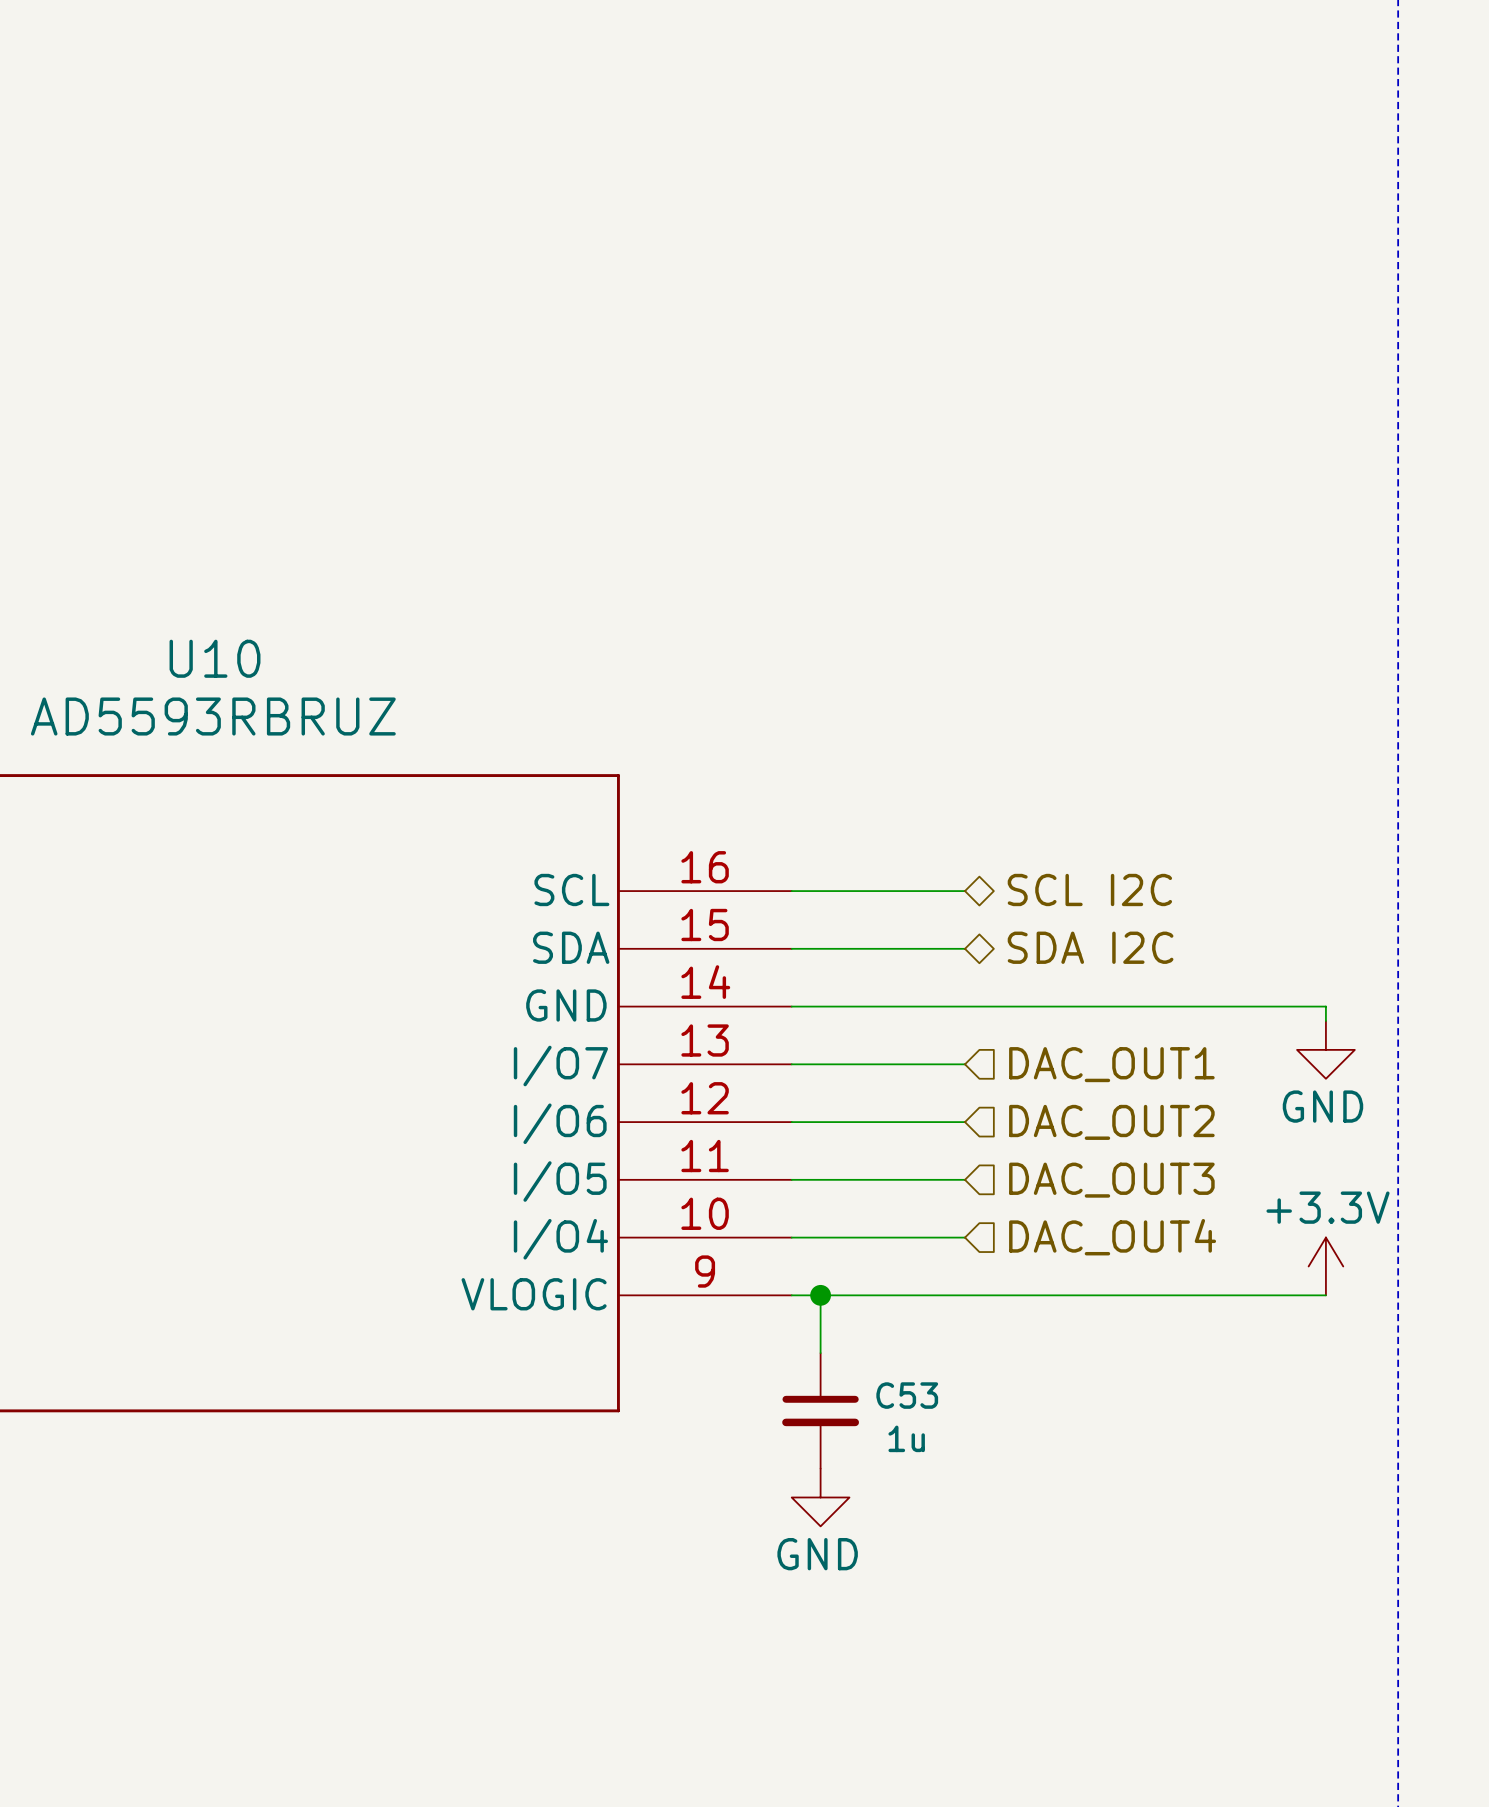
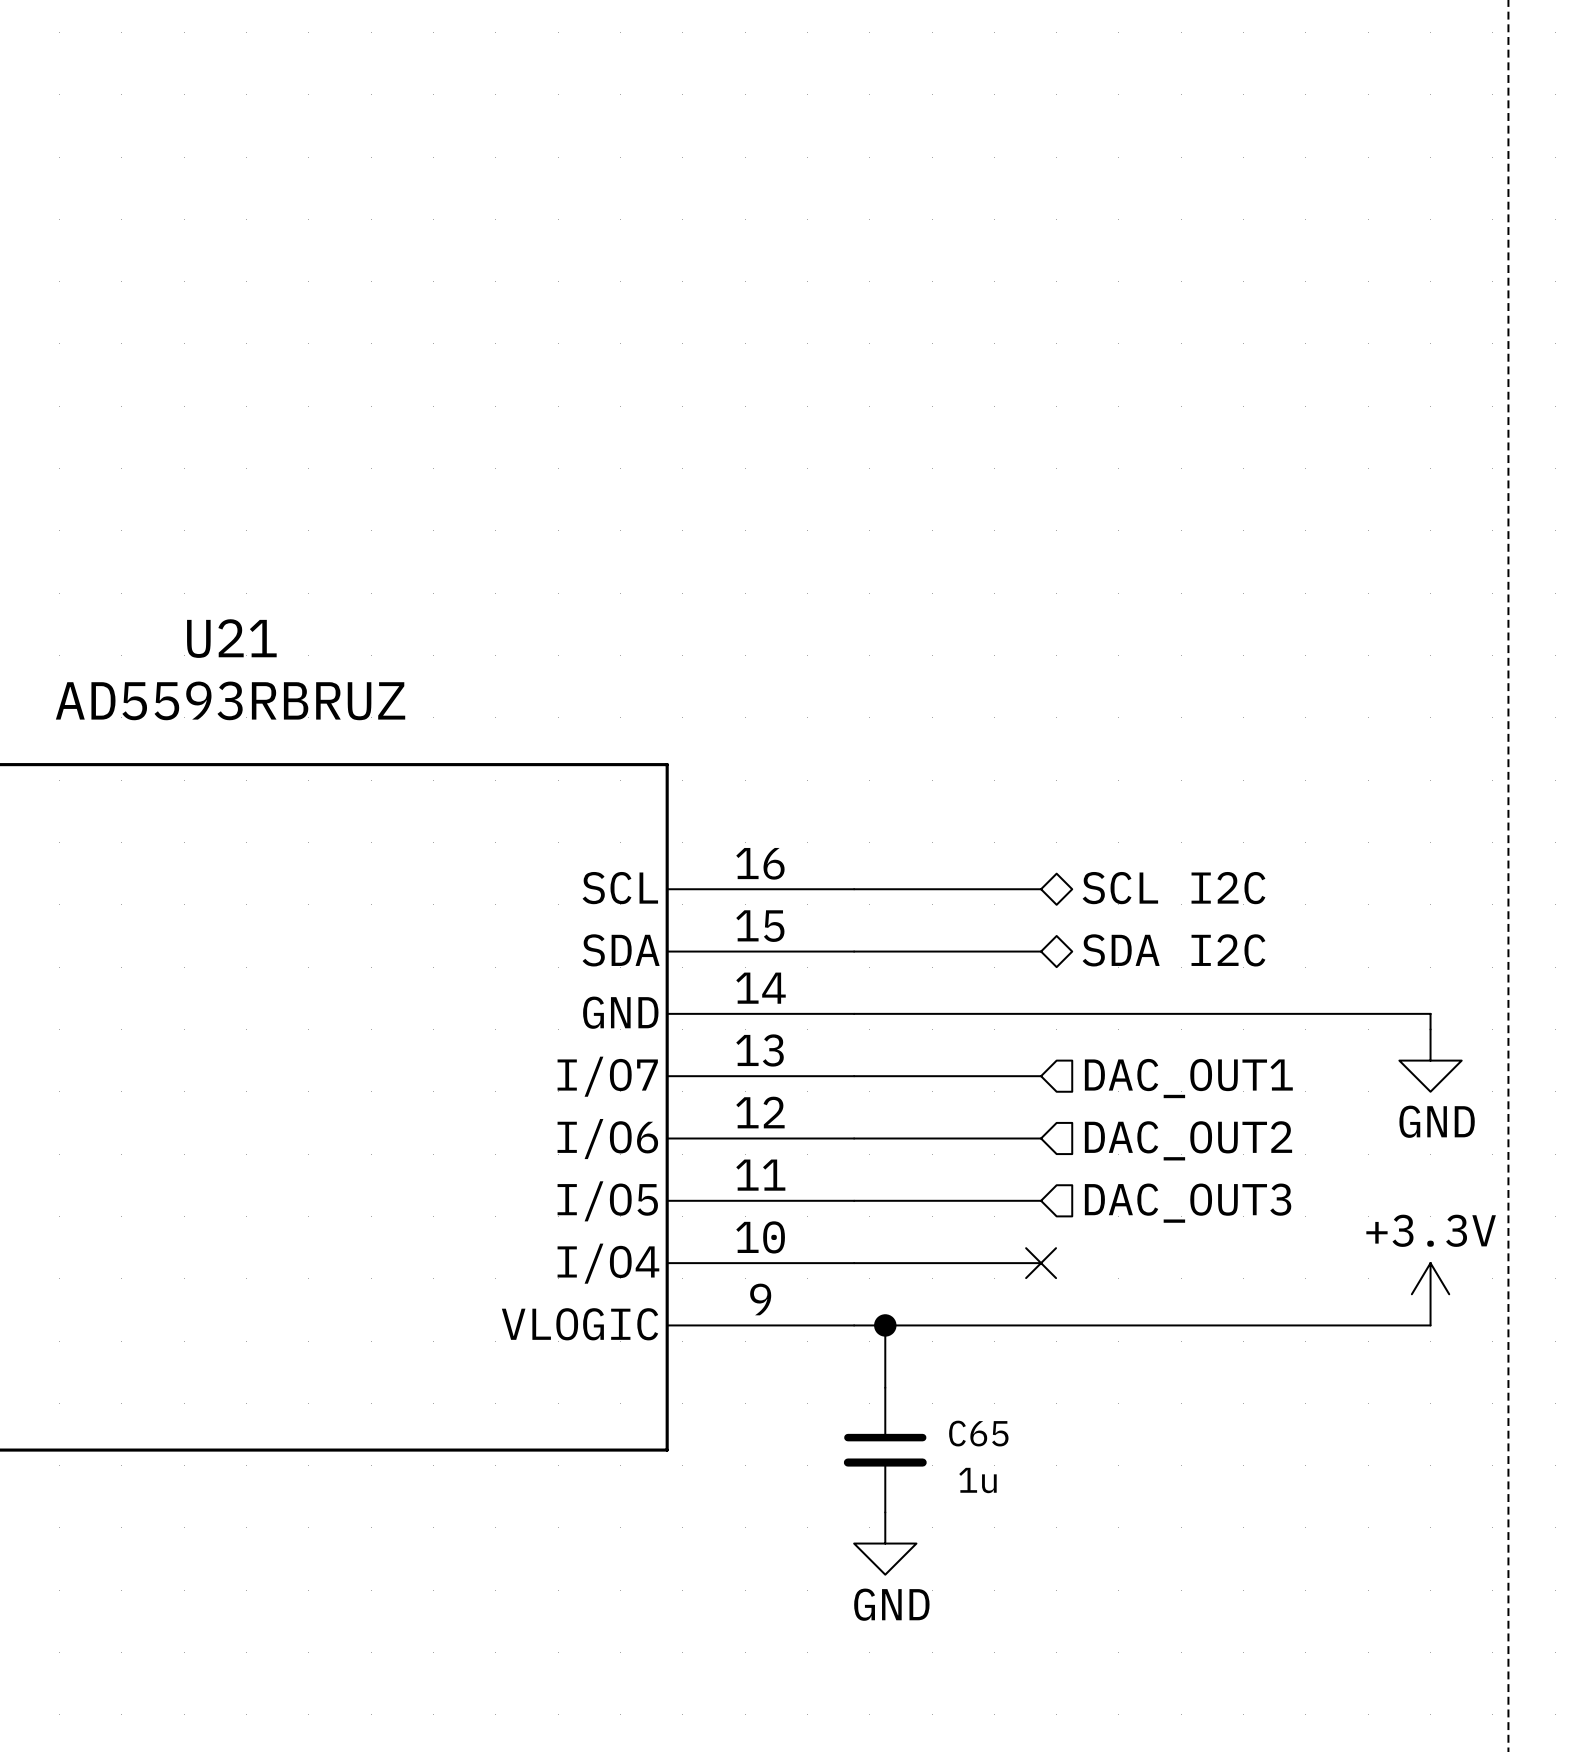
U10 name: U10 (215, 658) -> U21 (231, 638)
no-connect mark: none -> (1041, 1263)
hierarchical label: DAC_OUT4 (1112, 1237) -> none
C53 name: C53 (907, 1395) -> C65 (978, 1433)

